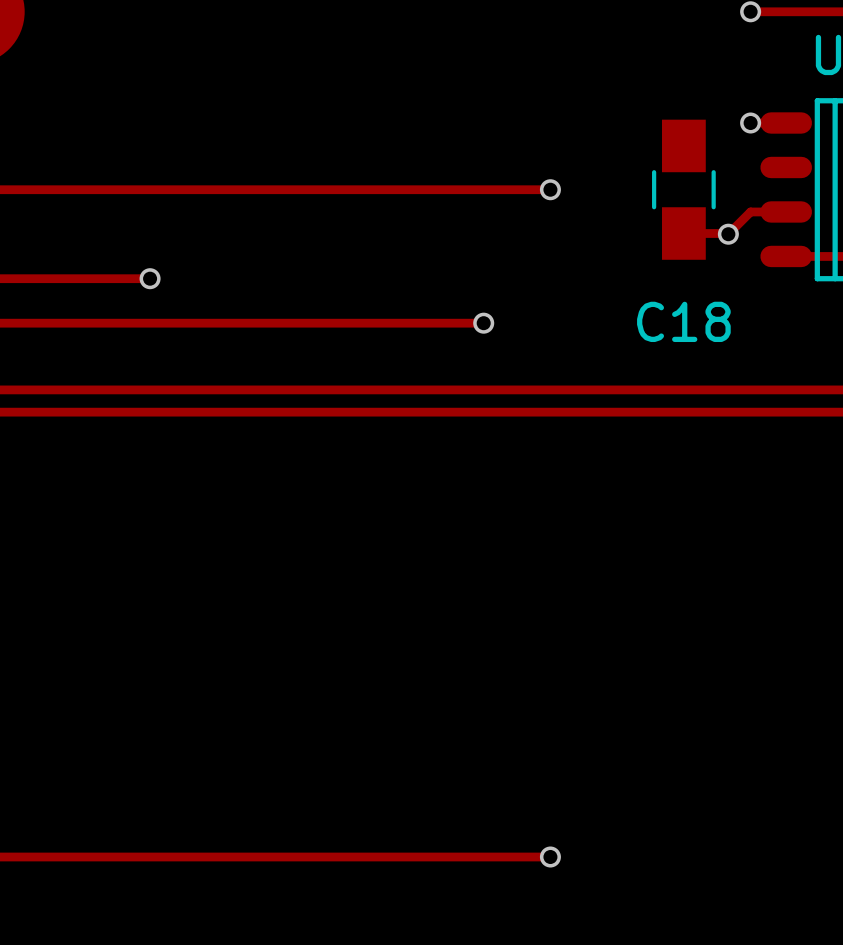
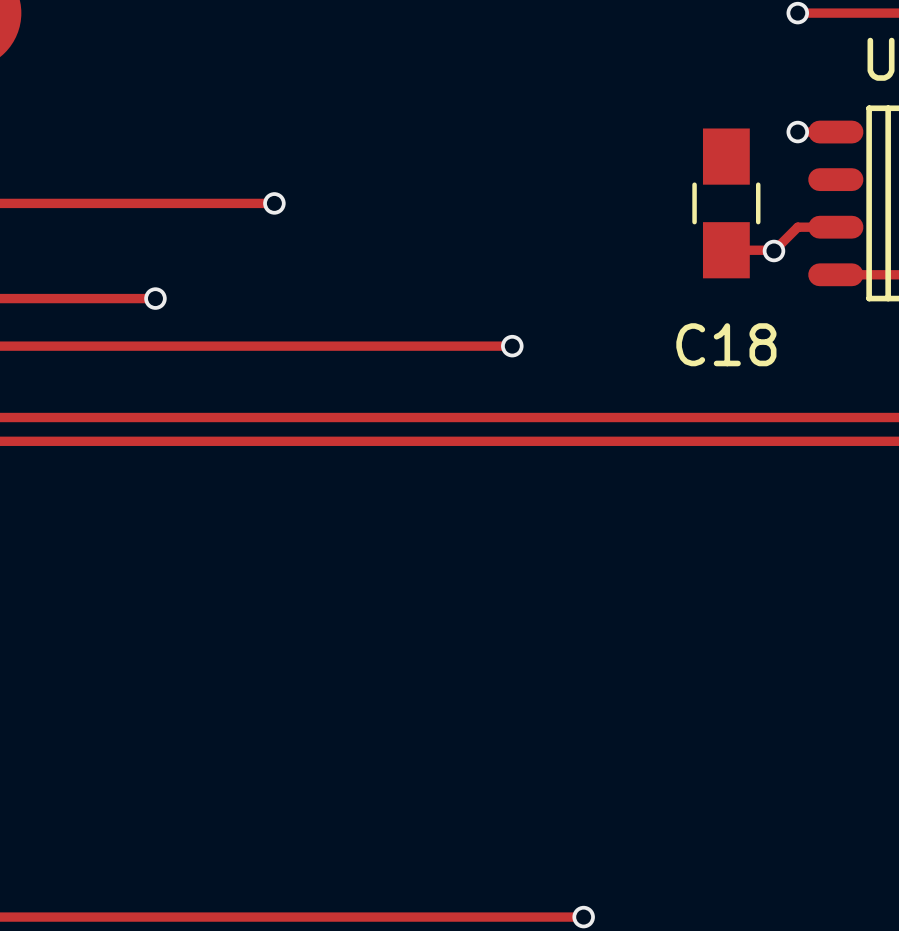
track: (261, 189) (550, 189) -> none
via: none -> (274, 203)
via: (550, 189) -> none

